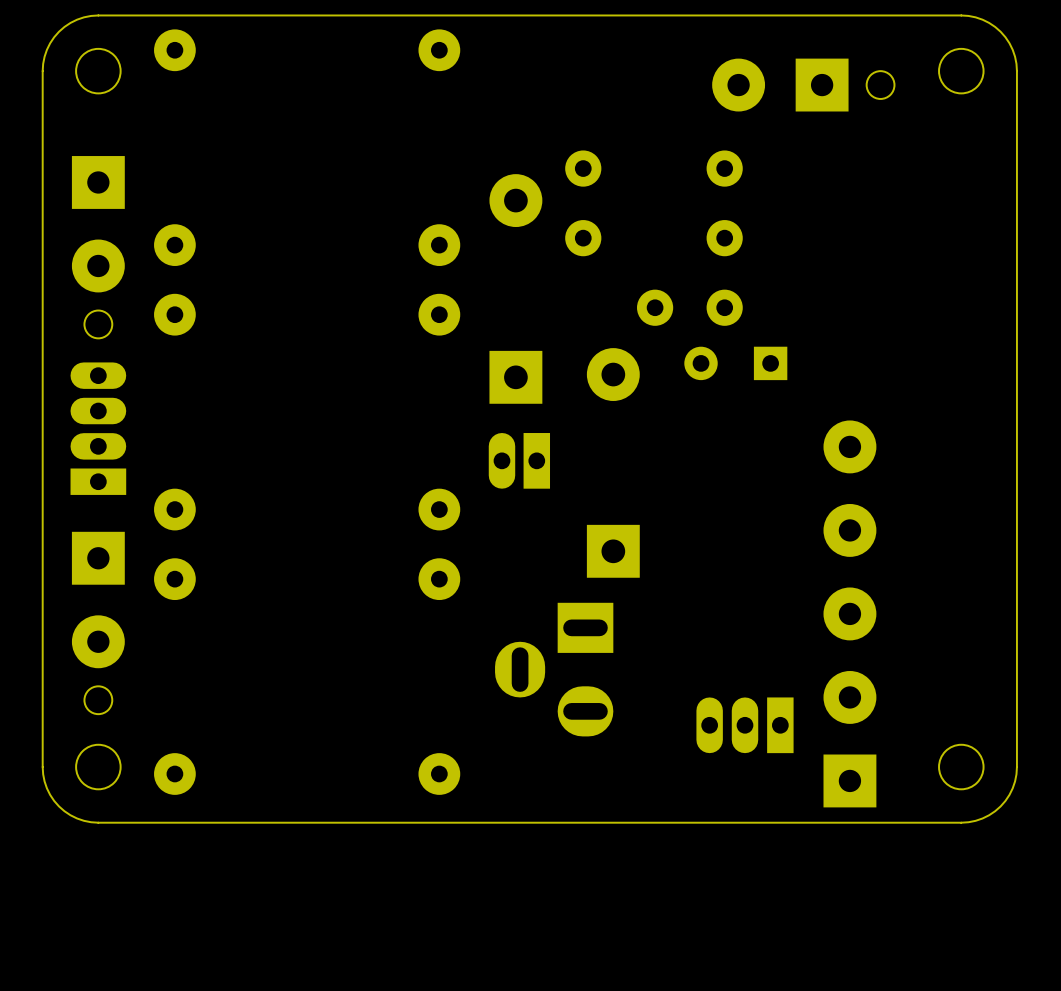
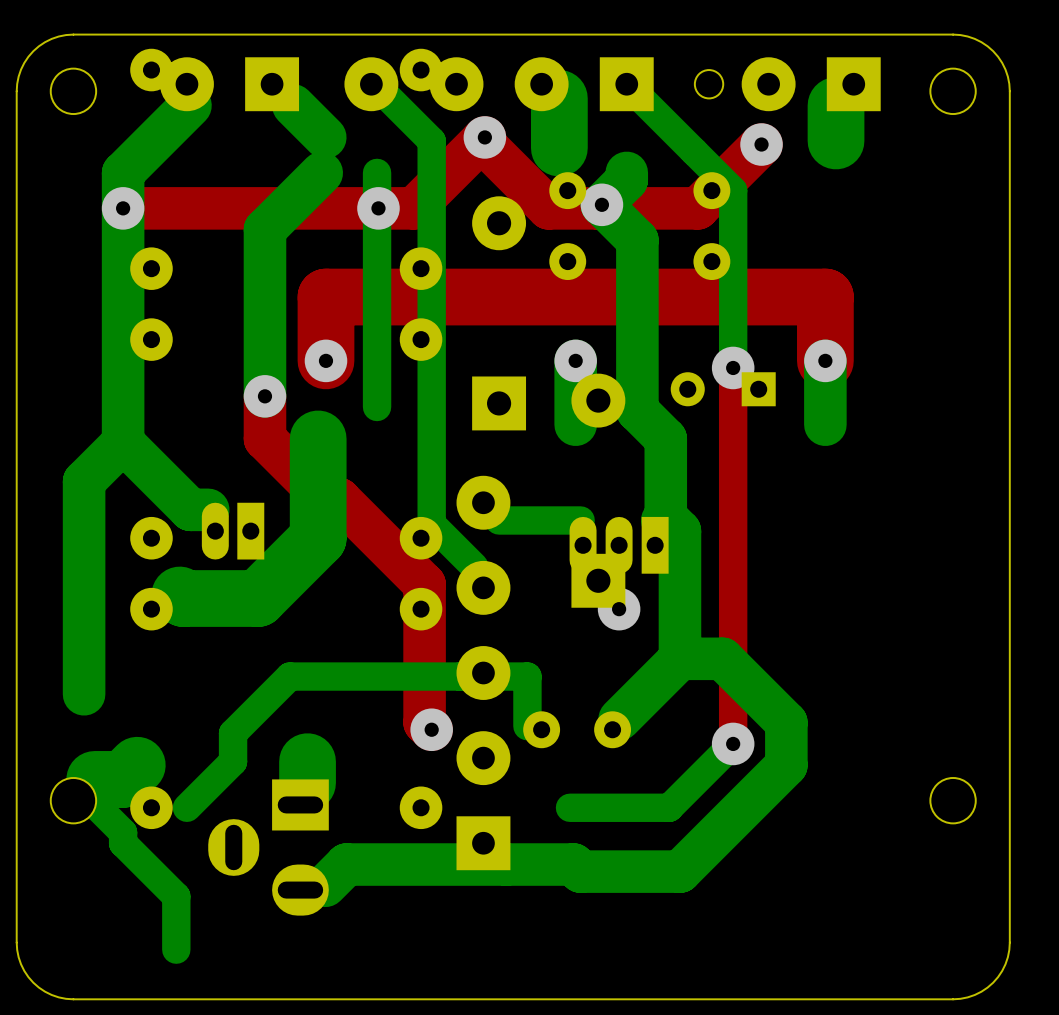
part: none -> (229, 84)
part: none -> (499, 84)
bottom track: none -> (626, 84) (733, 190) (733, 367)
part: none -> (787, 84)
bottom track: none -> (389, 98) (431, 140) (431, 524) (474, 566)
bottom track: none -> (559, 98) (559, 148)
bottom track: none -> (190, 105) (123, 172) (123, 442)
bottom track: none -> (293, 105) (325, 137)
part: (803, 85) -> none
bottom track: none -> (836, 105) (836, 140)
top track: none -> (484, 137) (413, 208) (123, 208)
via: none -> (484, 137)
top track: none -> (481, 140) (548, 208) (697, 208) (761, 144)
via: none -> (761, 144)
bottom track: none -> (321, 172) (264, 229) (264, 396)
bottom track: none -> (377, 172) (377, 406)
bottom track: none -> (626, 172) (626, 179) (601, 204) (637, 240) (637, 410) (665, 438) (665, 516)
via: none -> (601, 204)
via: none -> (123, 208)
via: none -> (378, 208)
part: (98, 247) -> none
part: (689, 307) -> none
via: none -> (325, 360)
bottom track: none -> (575, 360) (575, 424)
via: none -> (575, 360)
top track: none -> (825, 360) (825, 297) (325, 297) (325, 360)
bottom track: none -> (825, 360) (825, 424)
via: none -> (825, 360)
top track: none -> (733, 367) (733, 743)
via: none -> (733, 367)
top track: none -> (264, 396) (264, 438) (325, 499) (339, 499) (424, 584) (424, 722) (431, 729)
via: none -> (264, 396)
bottom track: none -> (318, 438) (318, 538) (257, 598) (183, 598) (179, 594)
bottom track: none -> (123, 442) (84, 481) (84, 694)
bottom track: none -> (123, 442) (190, 509) (208, 509)
part: (98, 428) -> none
part position: (519, 460) -> (233, 531)
bottom track: none -> (665, 516) (679, 531) (679, 658)
bottom track: none -> (580, 520) (499, 520)
via: none -> (619, 609)
part: (849, 613) -> none
part: (98, 622) -> none
bottom track: none -> (679, 658) (619, 719)
bottom track: none -> (679, 658) (722, 658) (786, 722) (786, 765) (679, 871) (580, 871) (573, 864) (346, 864) (325, 885)
part: none -> (483, 673)
part position: (554, 669) -> (268, 847)
bottom track: none -> (527, 726) (527, 676) (289, 676) (233, 733) (233, 761) (186, 807)
via: none -> (431, 729)
part: none -> (577, 729)
bottom track: none -> (733, 743) (669, 807) (570, 807)
via: none -> (733, 743)
part position: (745, 725) -> (619, 545)
bottom track: none -> (307, 761) (307, 782)
bottom track: none -> (137, 765) (123, 779) (94, 779)
board edge: (1016, 767) (1012, 788) (1000, 806) (982, 818) (961, 822) (98, 822) (77, 818) (58, 806) (46, 788) (42, 767) -> (1009, 800) (1009, 942) (1007, 957) (998, 977) (987, 987) (974, 994) (953, 999) (73, 999) (58, 997) (45, 991) (33, 982) (24, 970) (18, 957) (16, 942) (16, 800)
bottom track: none -> (94, 804) (123, 832) (123, 843) (176, 896) (176, 949)

